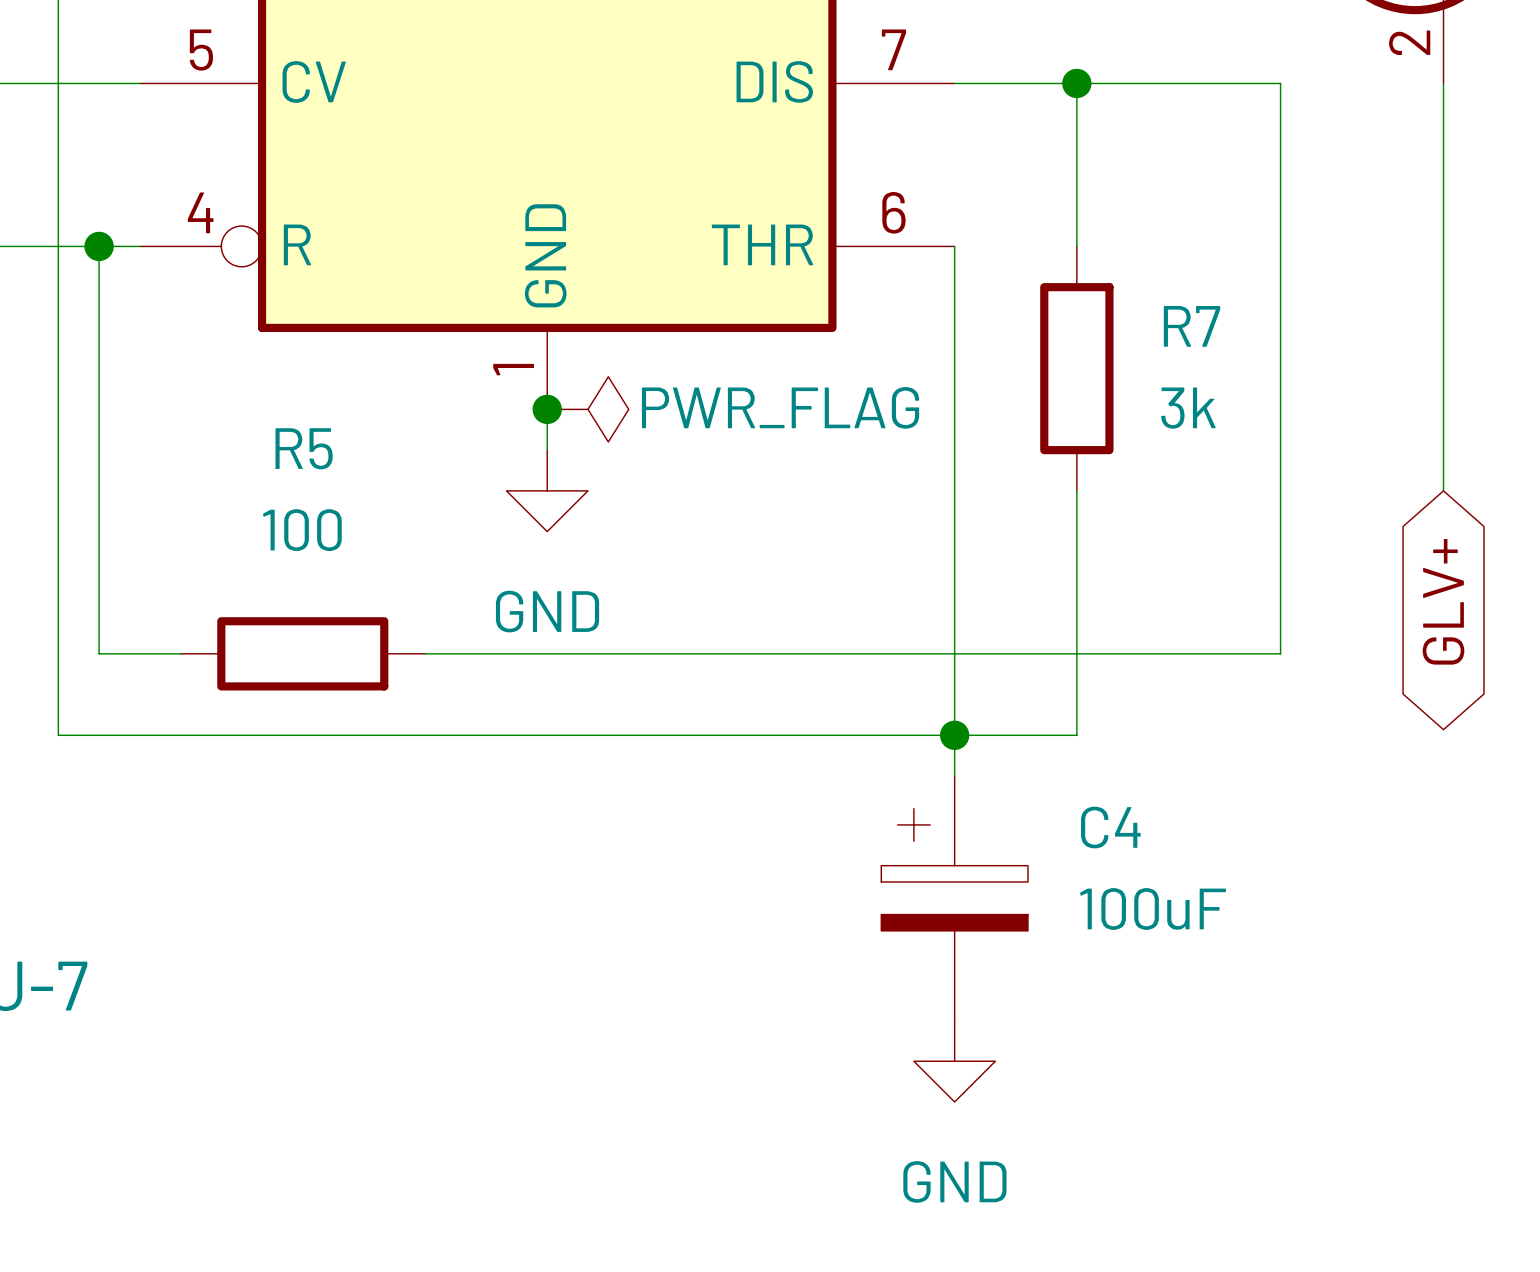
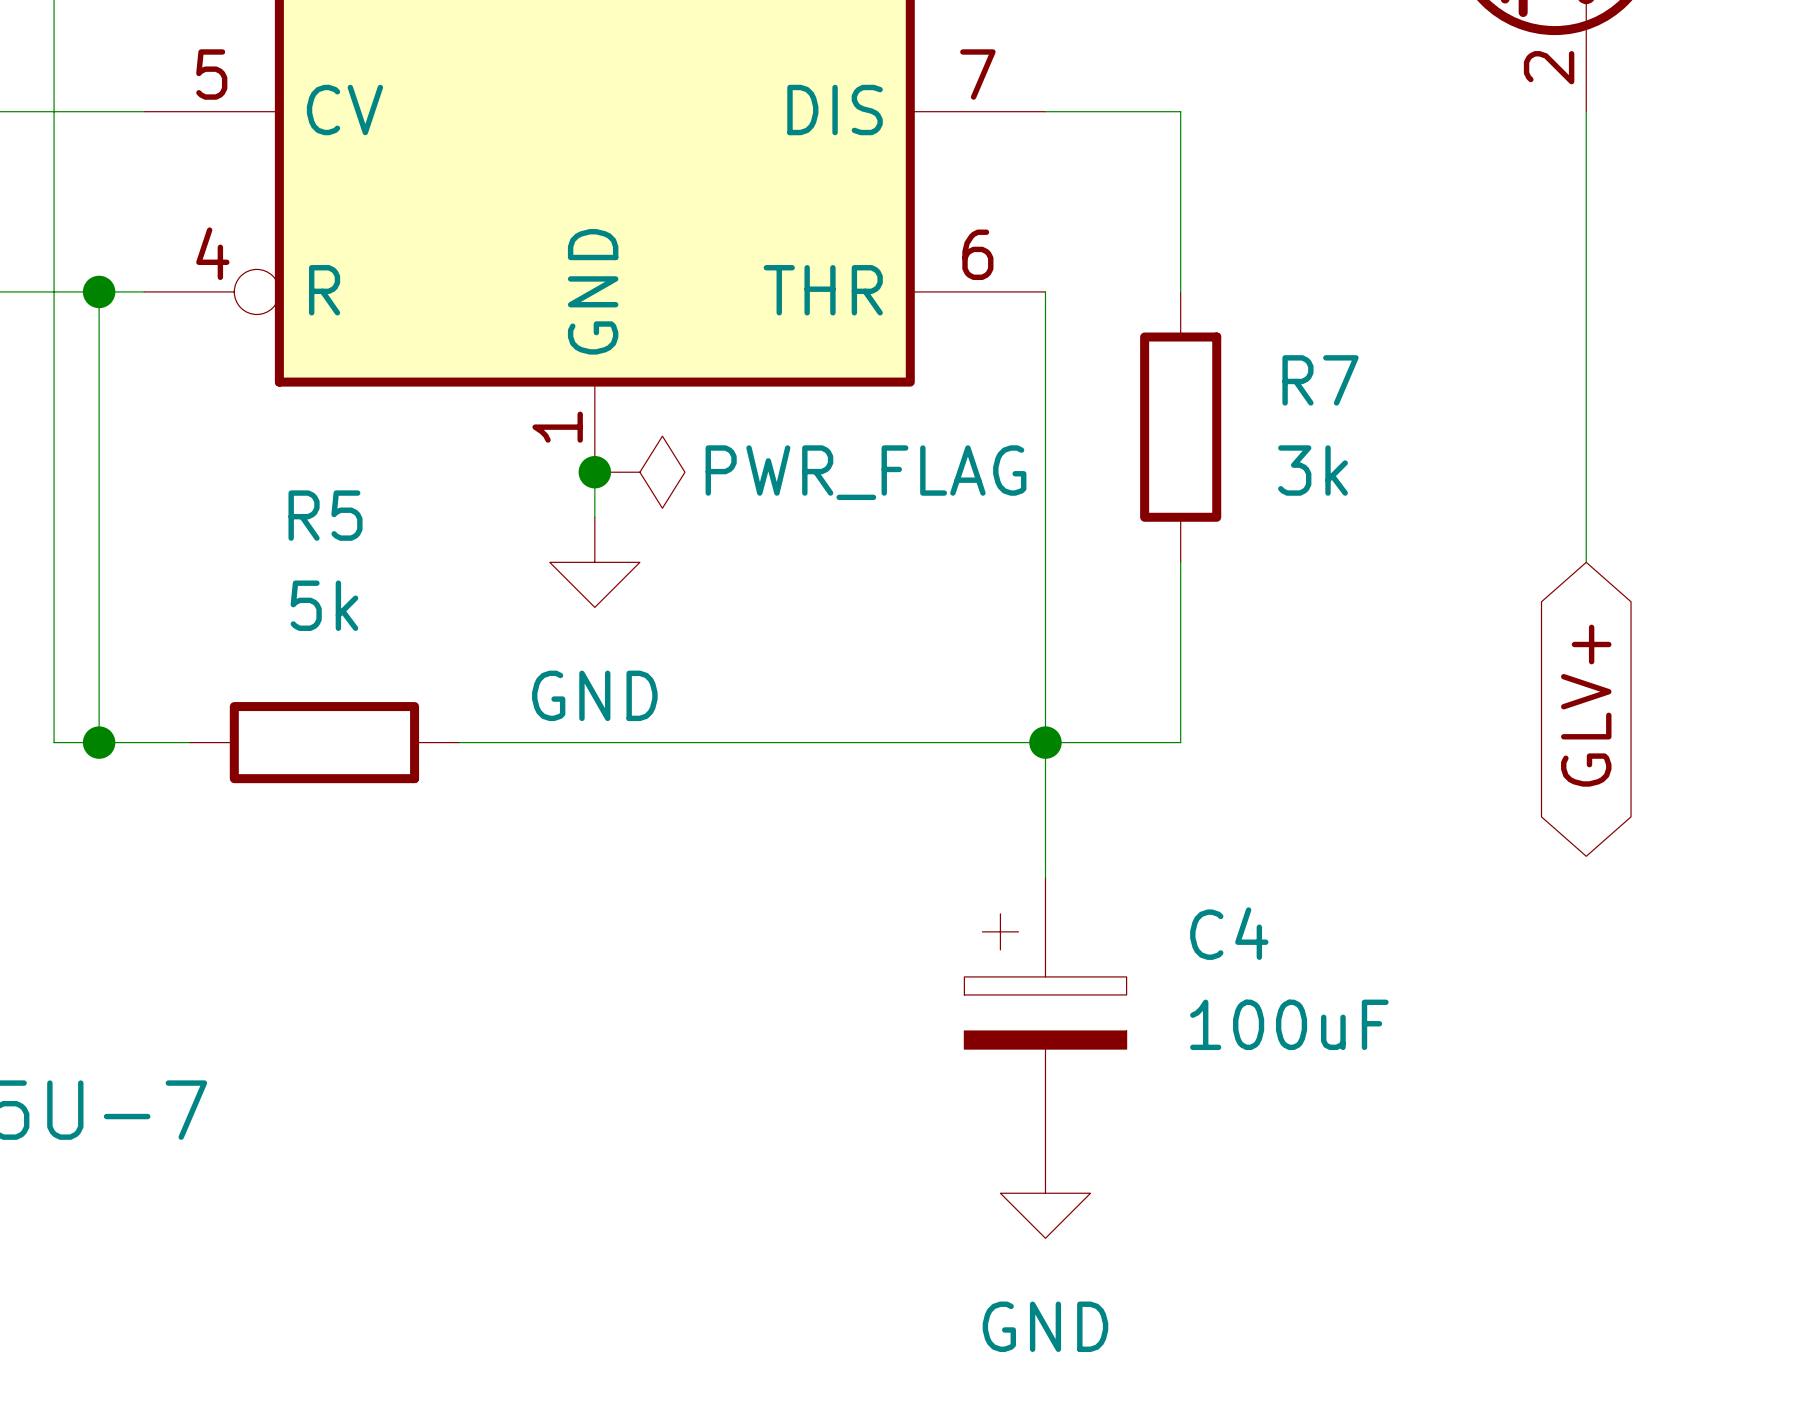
wire: (1076, 83) (1280, 83) (1280, 653) (1076, 653) (1076, 735) (58, 735) (58, 653) -> (99, 742) (54, 742)
junction: (1076, 83) -> none
R5 value: 100 (302, 530) -> 5k (324, 605)
junction: none -> (99, 742)
junction position: (954, 735) -> (1045, 742)

